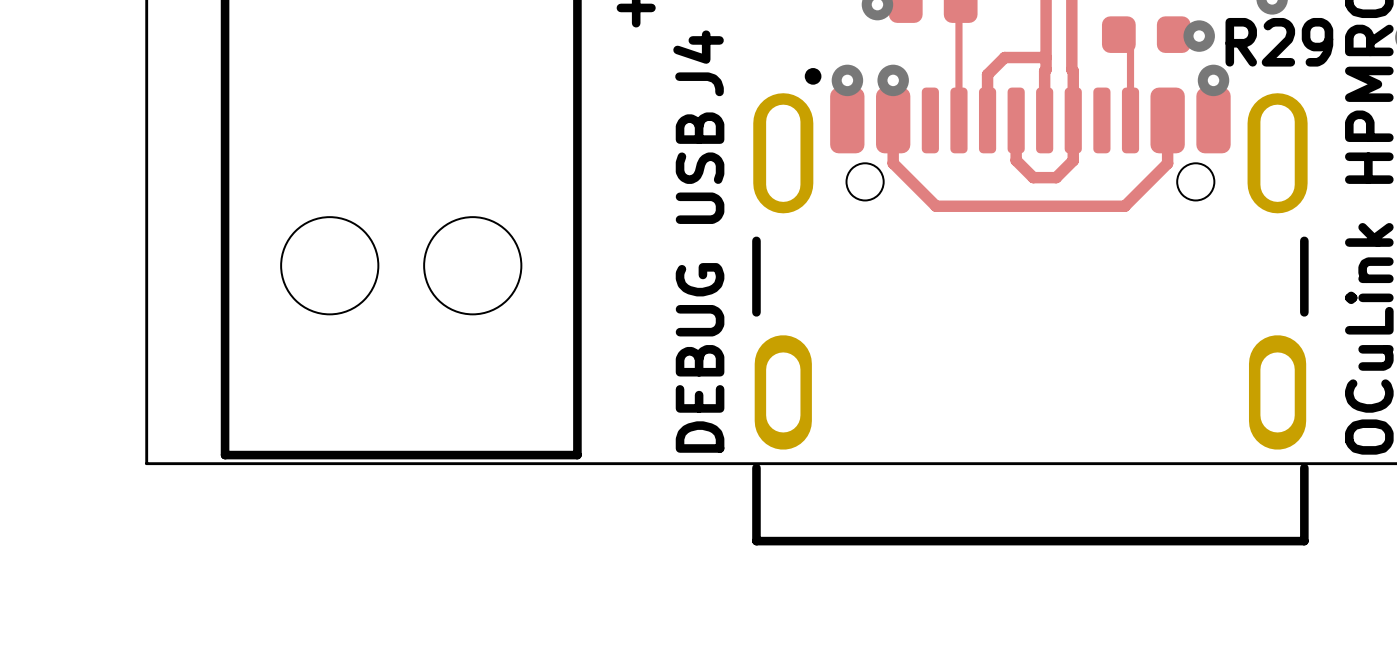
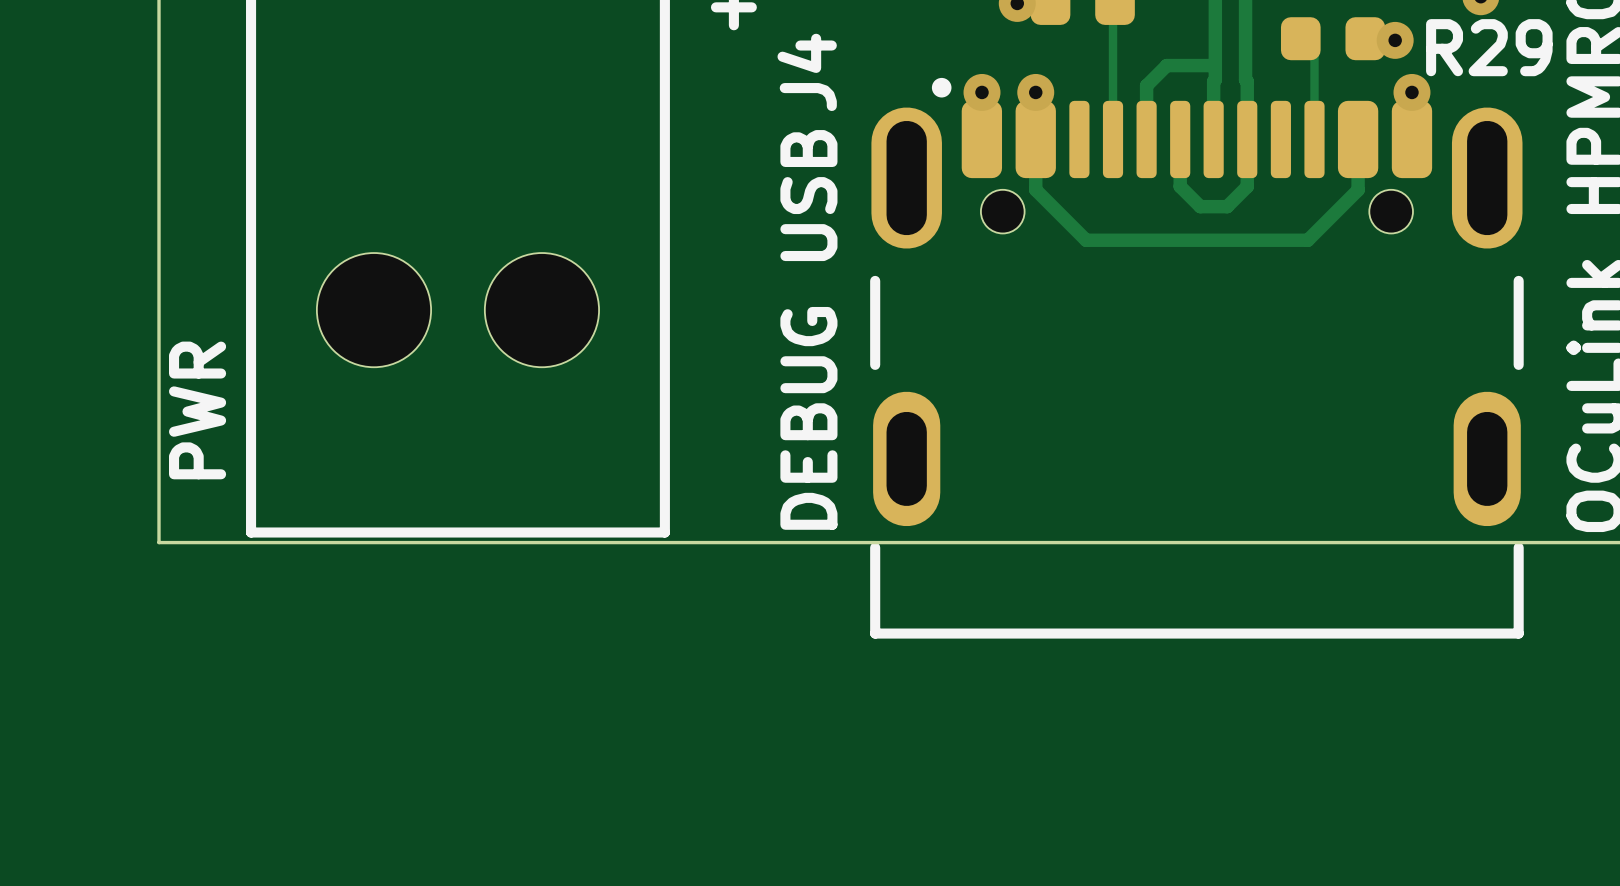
text: none -> PWR (197, 410)

